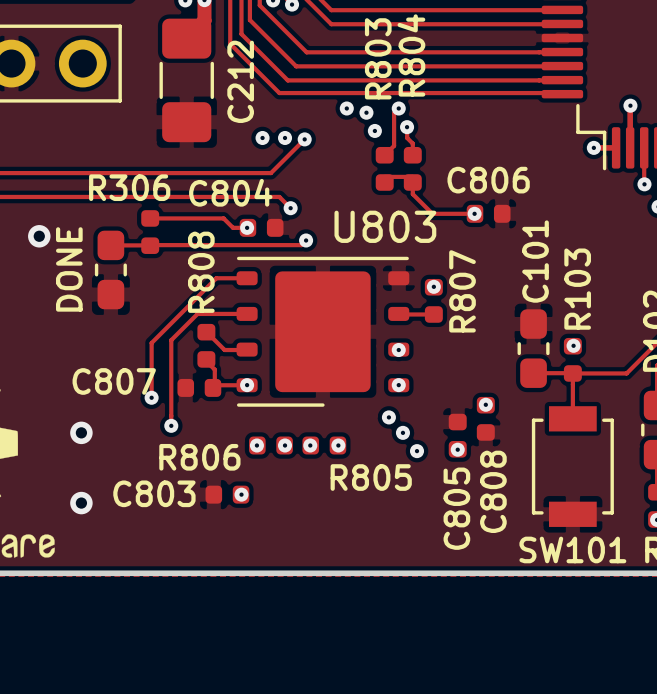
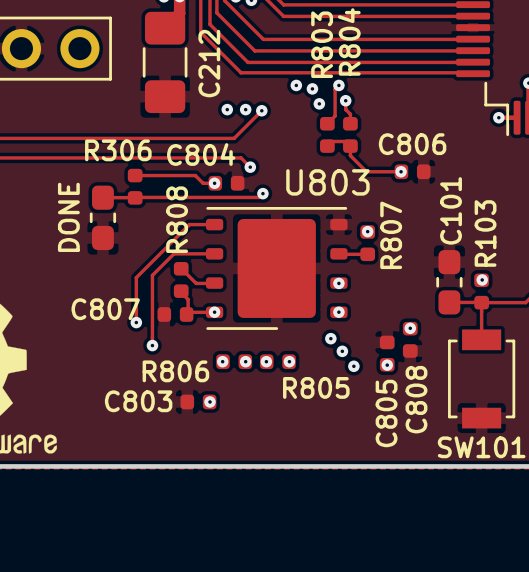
via: (39, 236) -> none
via: (81, 432) -> none
via: (81, 503) -> none

